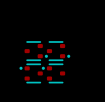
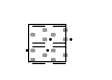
line: none -> (28, 24) (65, 24) (65, 61) (28, 61) (28, 24)

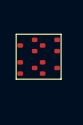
part footprint: [30, 25, 52, 44] -> [17, 37, 38, 54]
part footprint: [50, 25, 73, 44] -> [39, 37, 60, 54]
part footprint: [25, 46, 48, 65] -> [17, 60, 38, 76]
part footprint: [46, 46, 68, 65] -> [39, 60, 60, 76]

